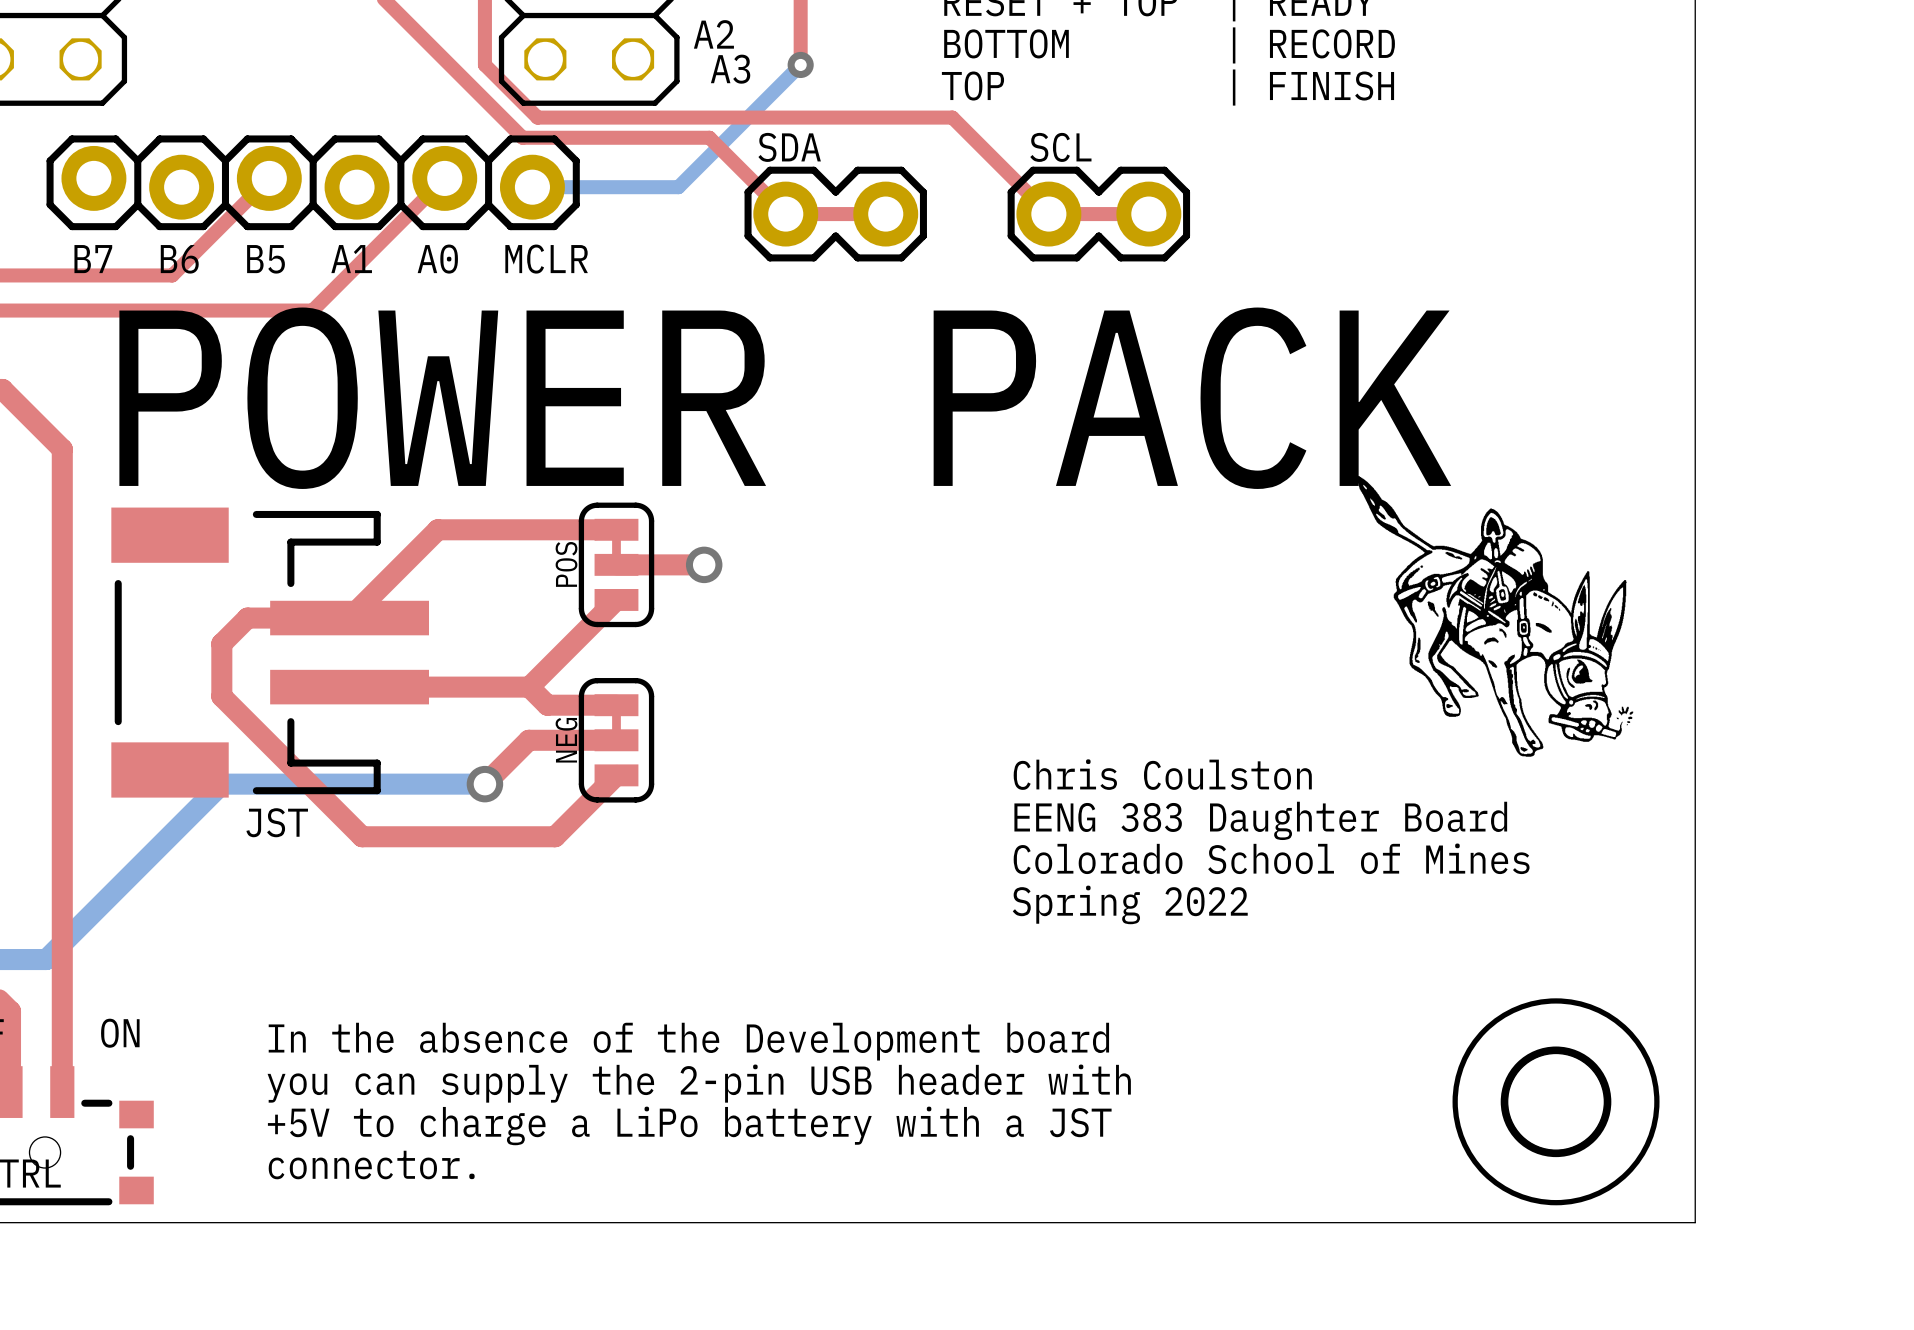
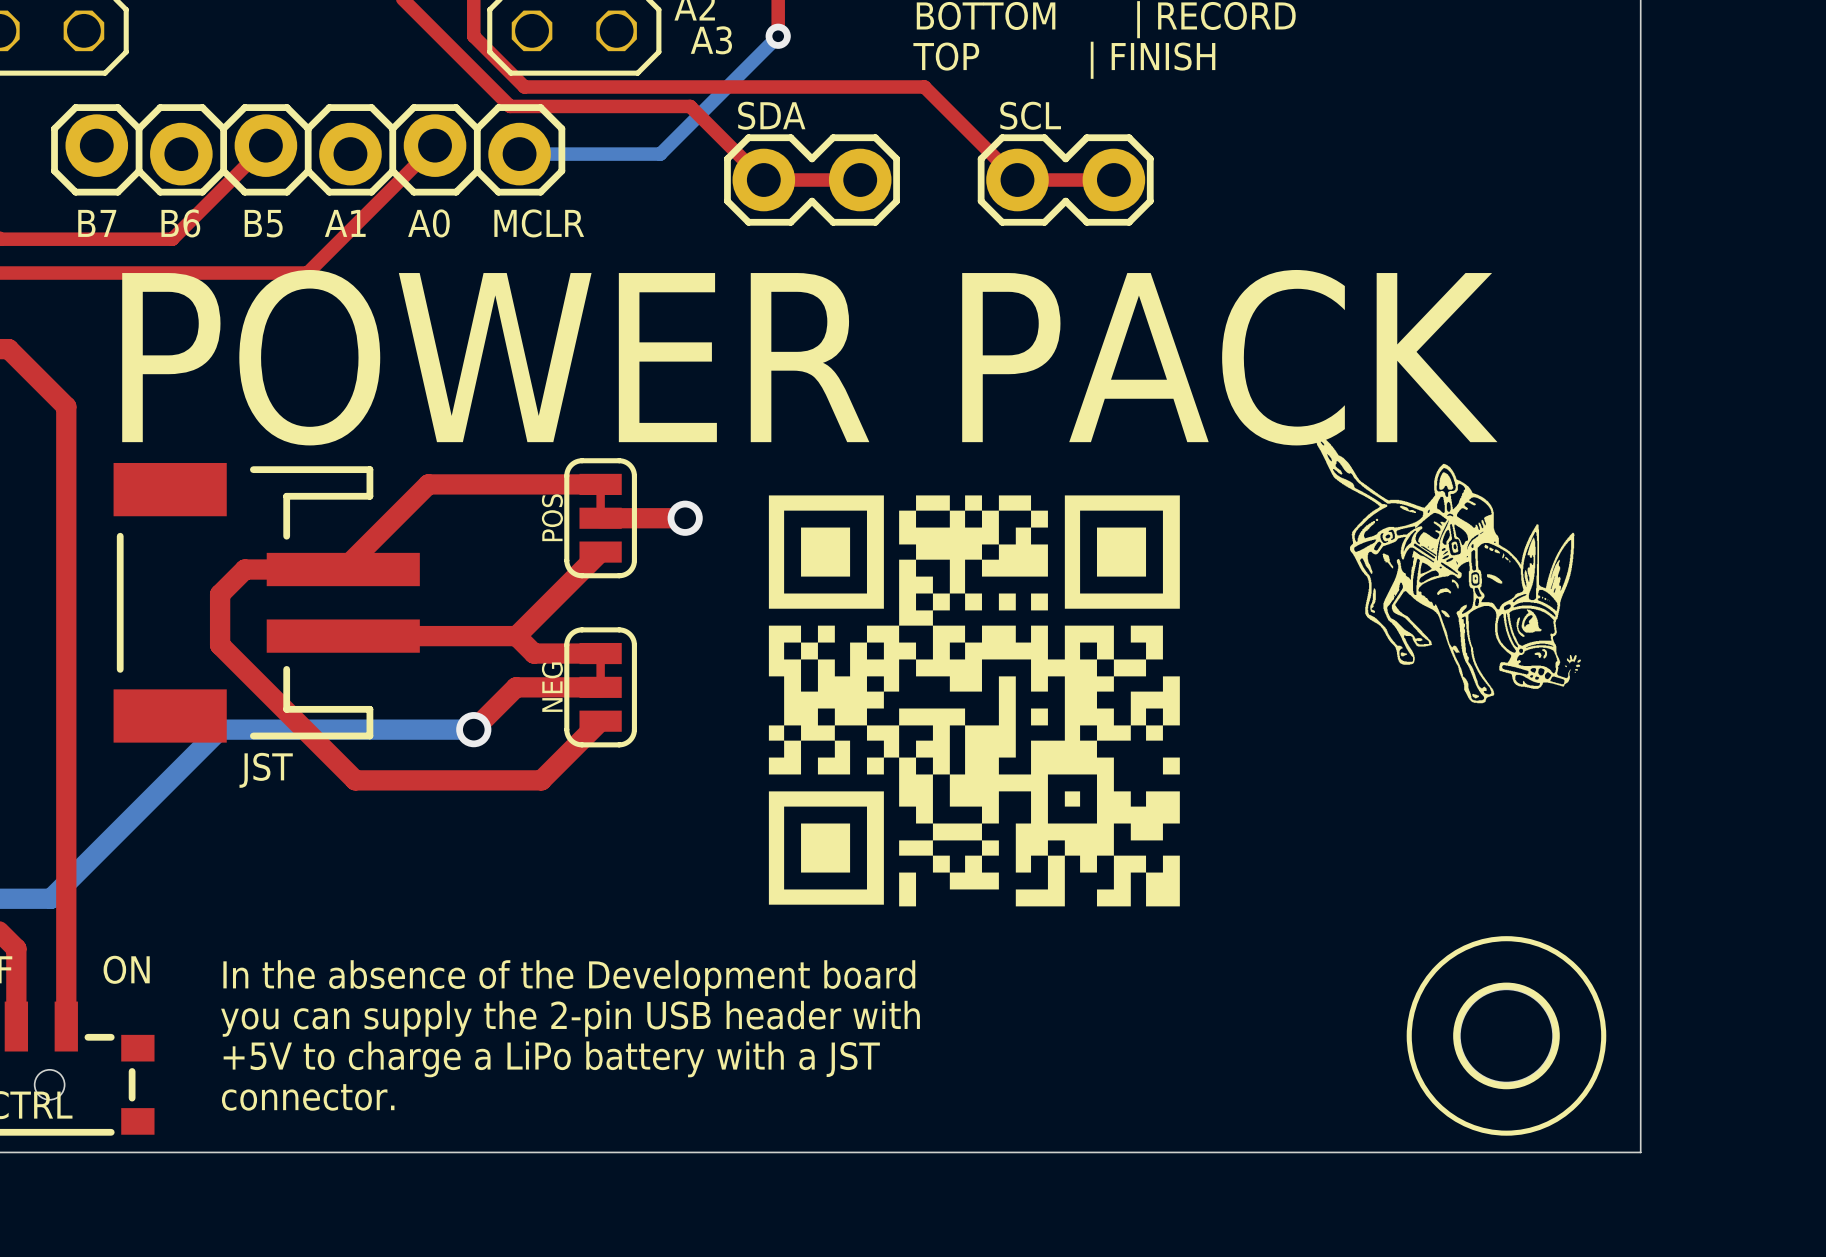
drawing: none -> [768, 495, 1180, 907]
text: Chris Coulston (1162, 774) -> none
text: EENG 383 Daughter Board (1260, 820) -> none
text: Colorado School of Mines (1271, 858) -> none
text: Spring 2022 (1130, 904) -> none
text position: In the absence of the Development board (688, 1041) -> In the absence of the Development board (569, 978)
text position: you can supply the 2-pin USB header with (699, 1083) -> you can supply the 2-pin USB header with (570, 1018)
text position: +5V to charge a LiPo battery with a JST (689, 1125) -> +5V to charge a LiPo battery with a JST (551, 1059)
text position: connector. (371, 1165) -> connector. (308, 1097)

